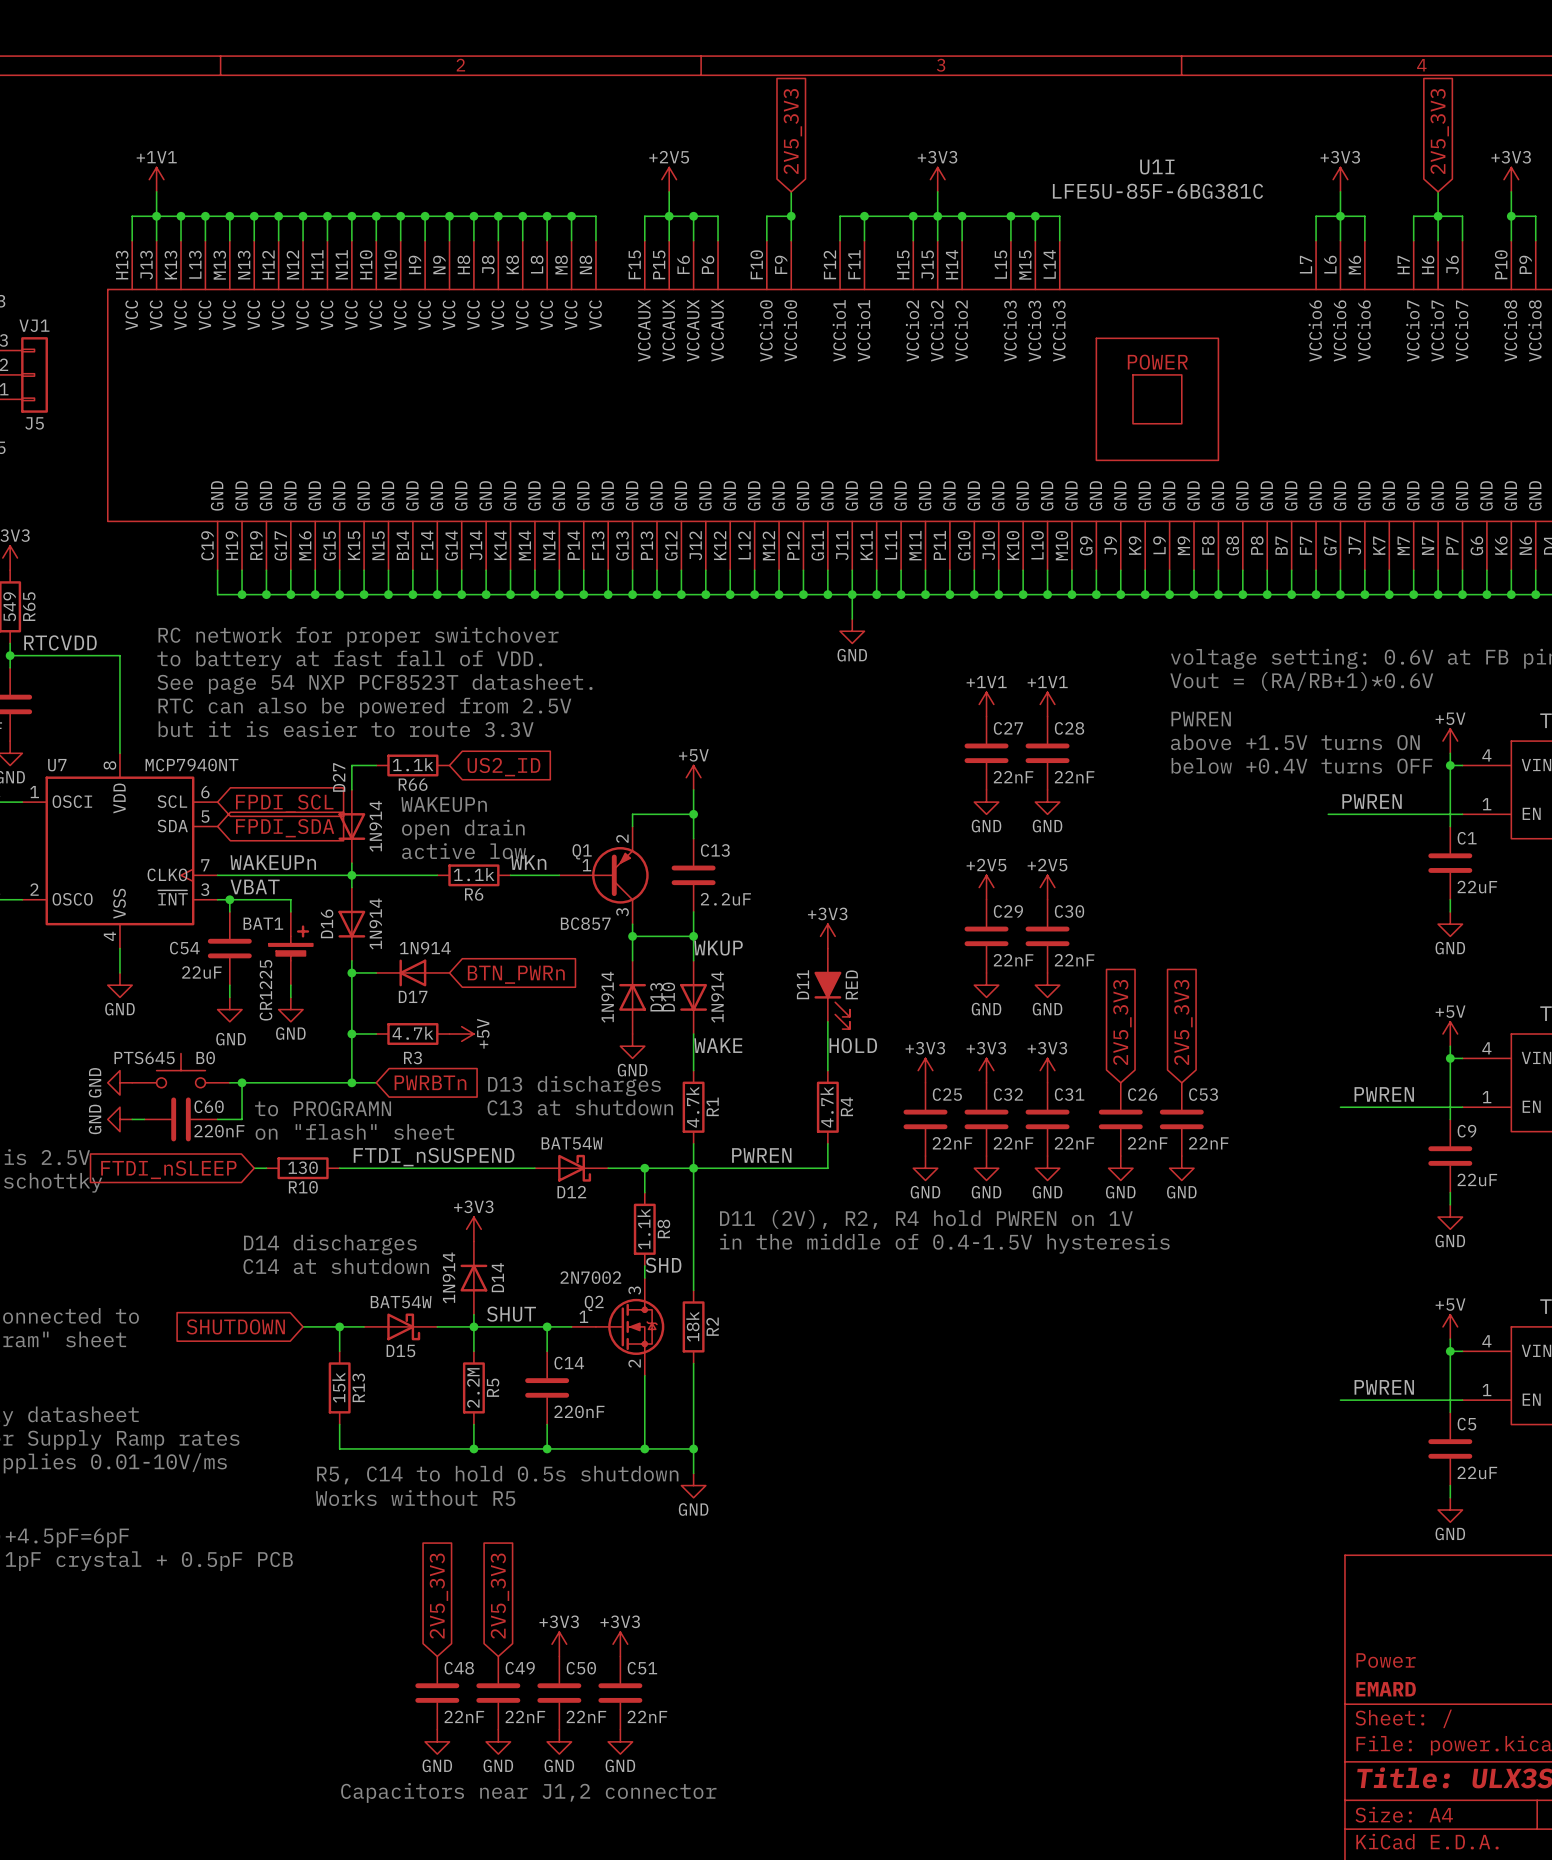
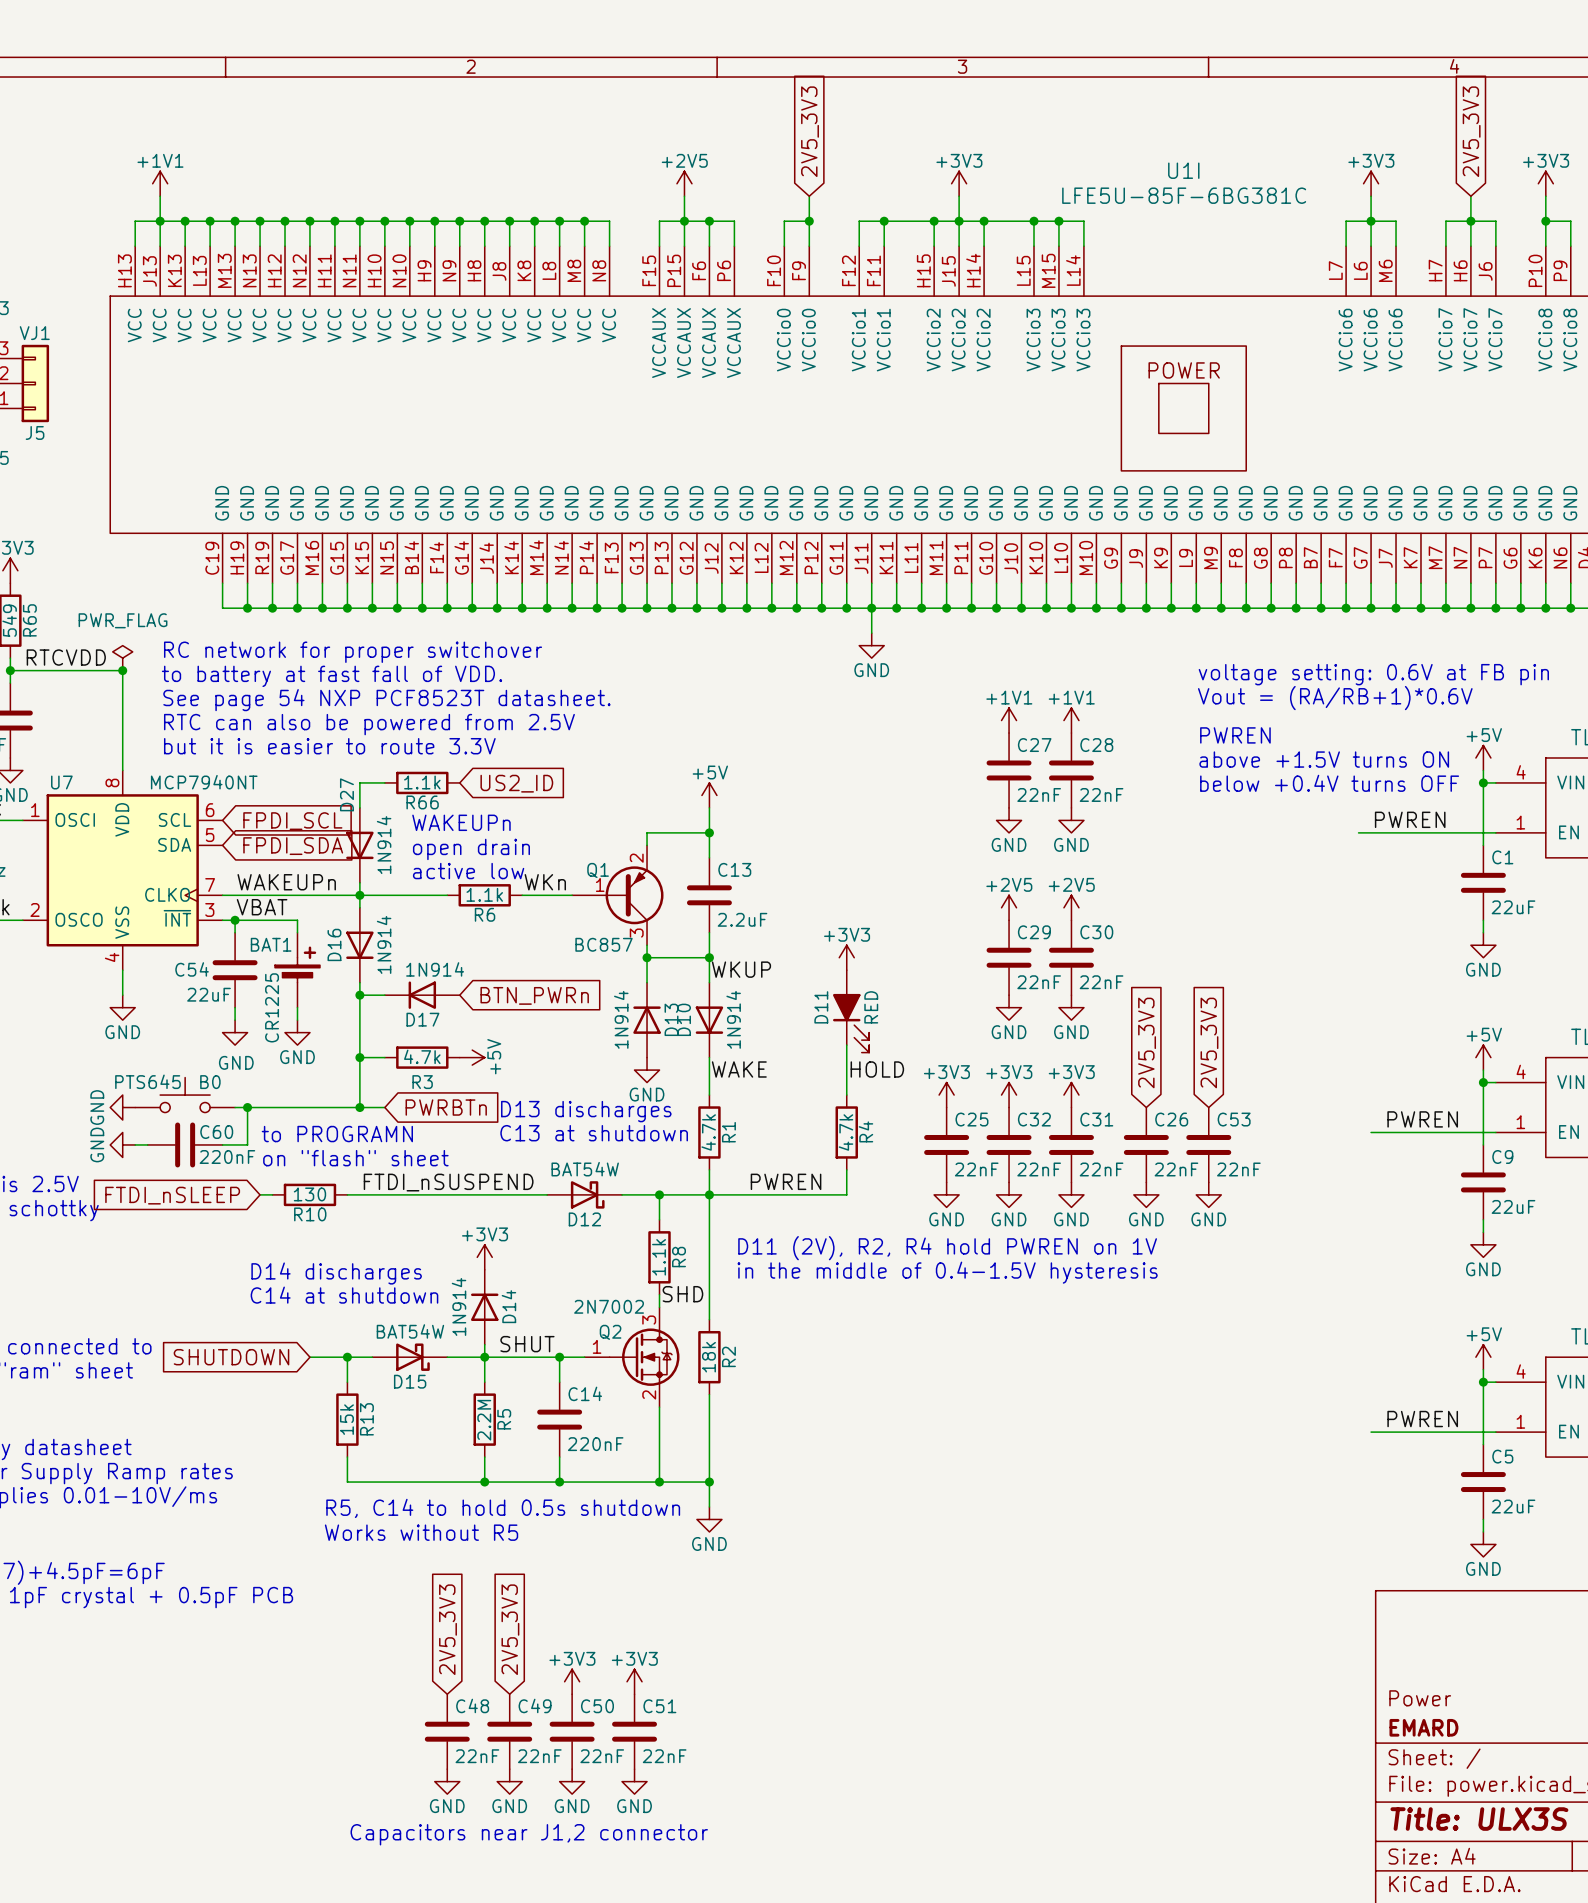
power symbol: none -> PWR_FLAG (122, 658)
junction: none -> (122, 670)

